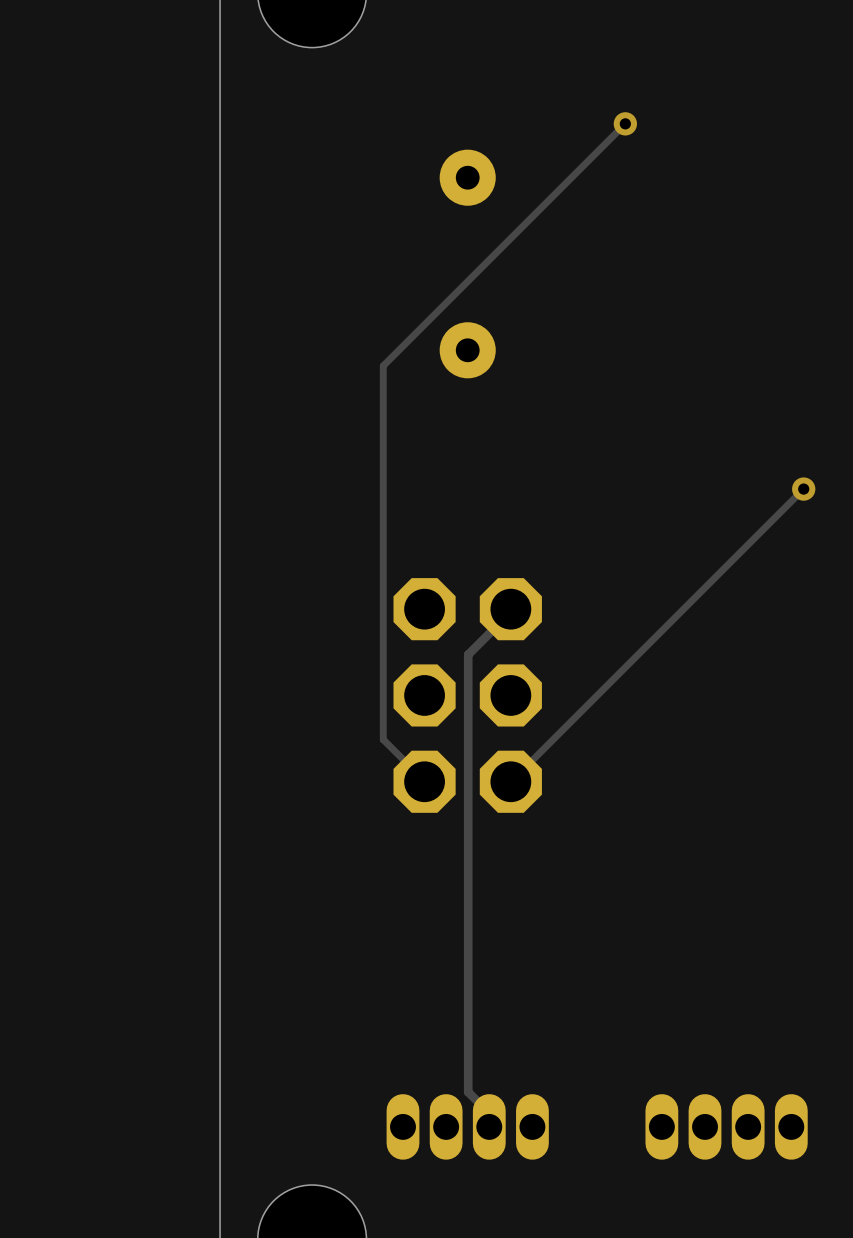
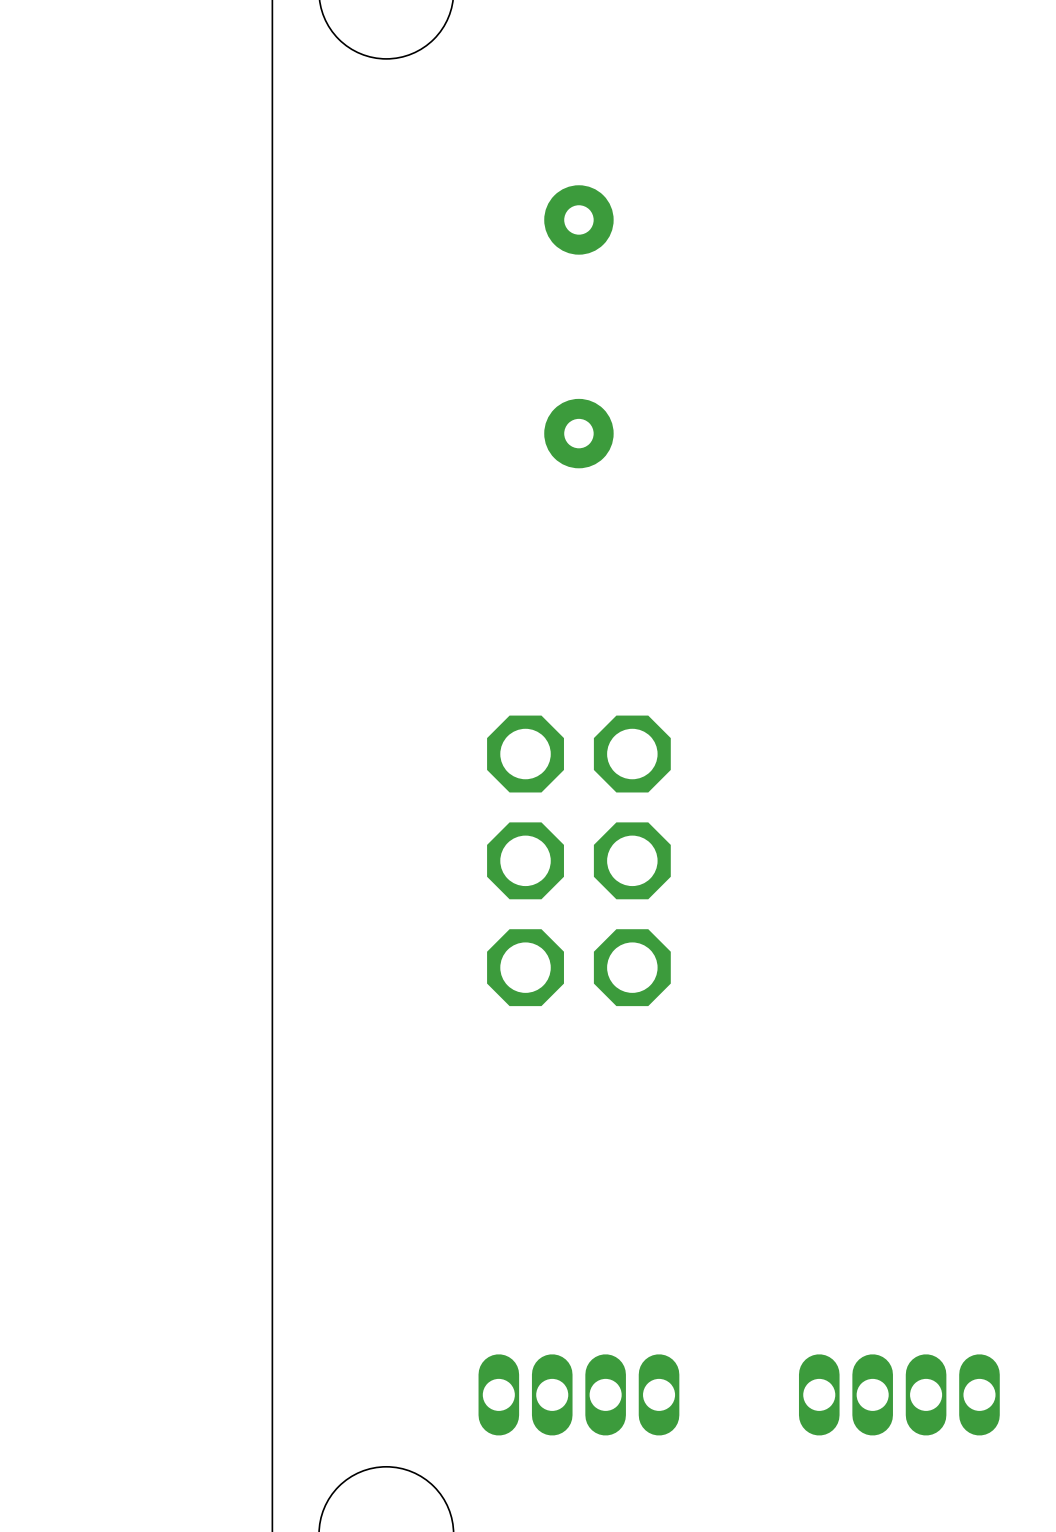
track: (625, 123) (383, 365) (383, 739) (424, 781) -> none
via: (625, 123) -> none
track: (803, 489) (510, 781) -> none
via: (803, 489) -> none
track: (510, 609) (510, 612) (468, 654) (468, 1092) (485, 1109) (485, 1126) (489, 1126) -> none

